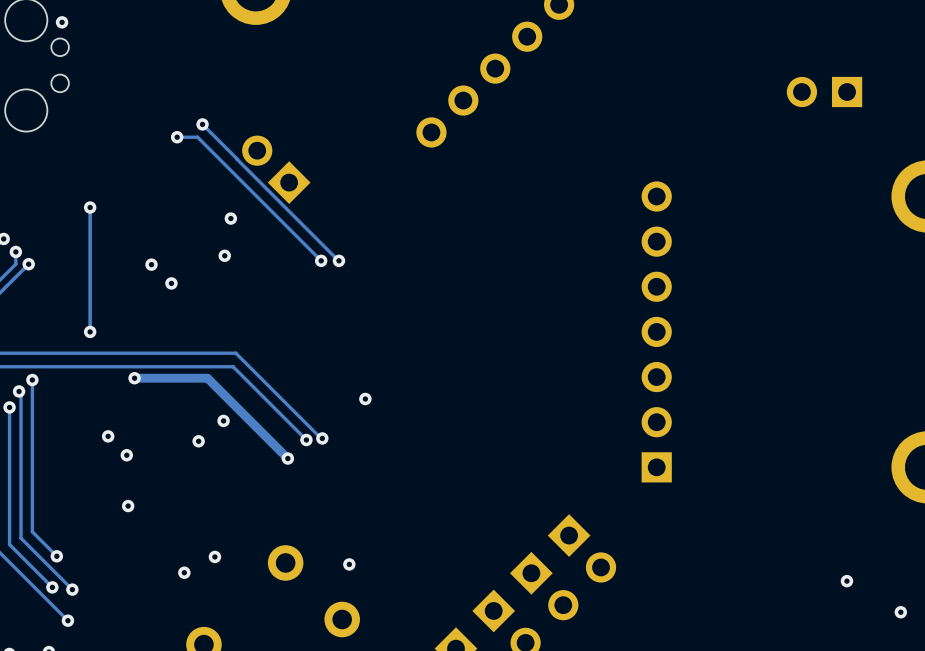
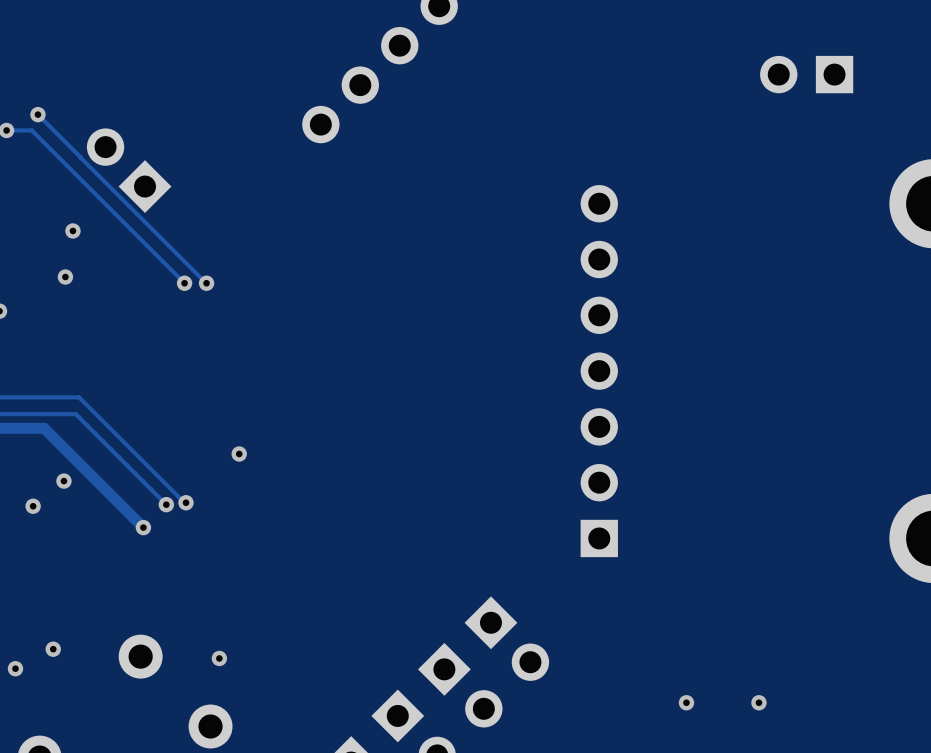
via: (846, 581) -> none
via: none -> (686, 702)
via: none -> (758, 702)
via: (900, 612) -> none

